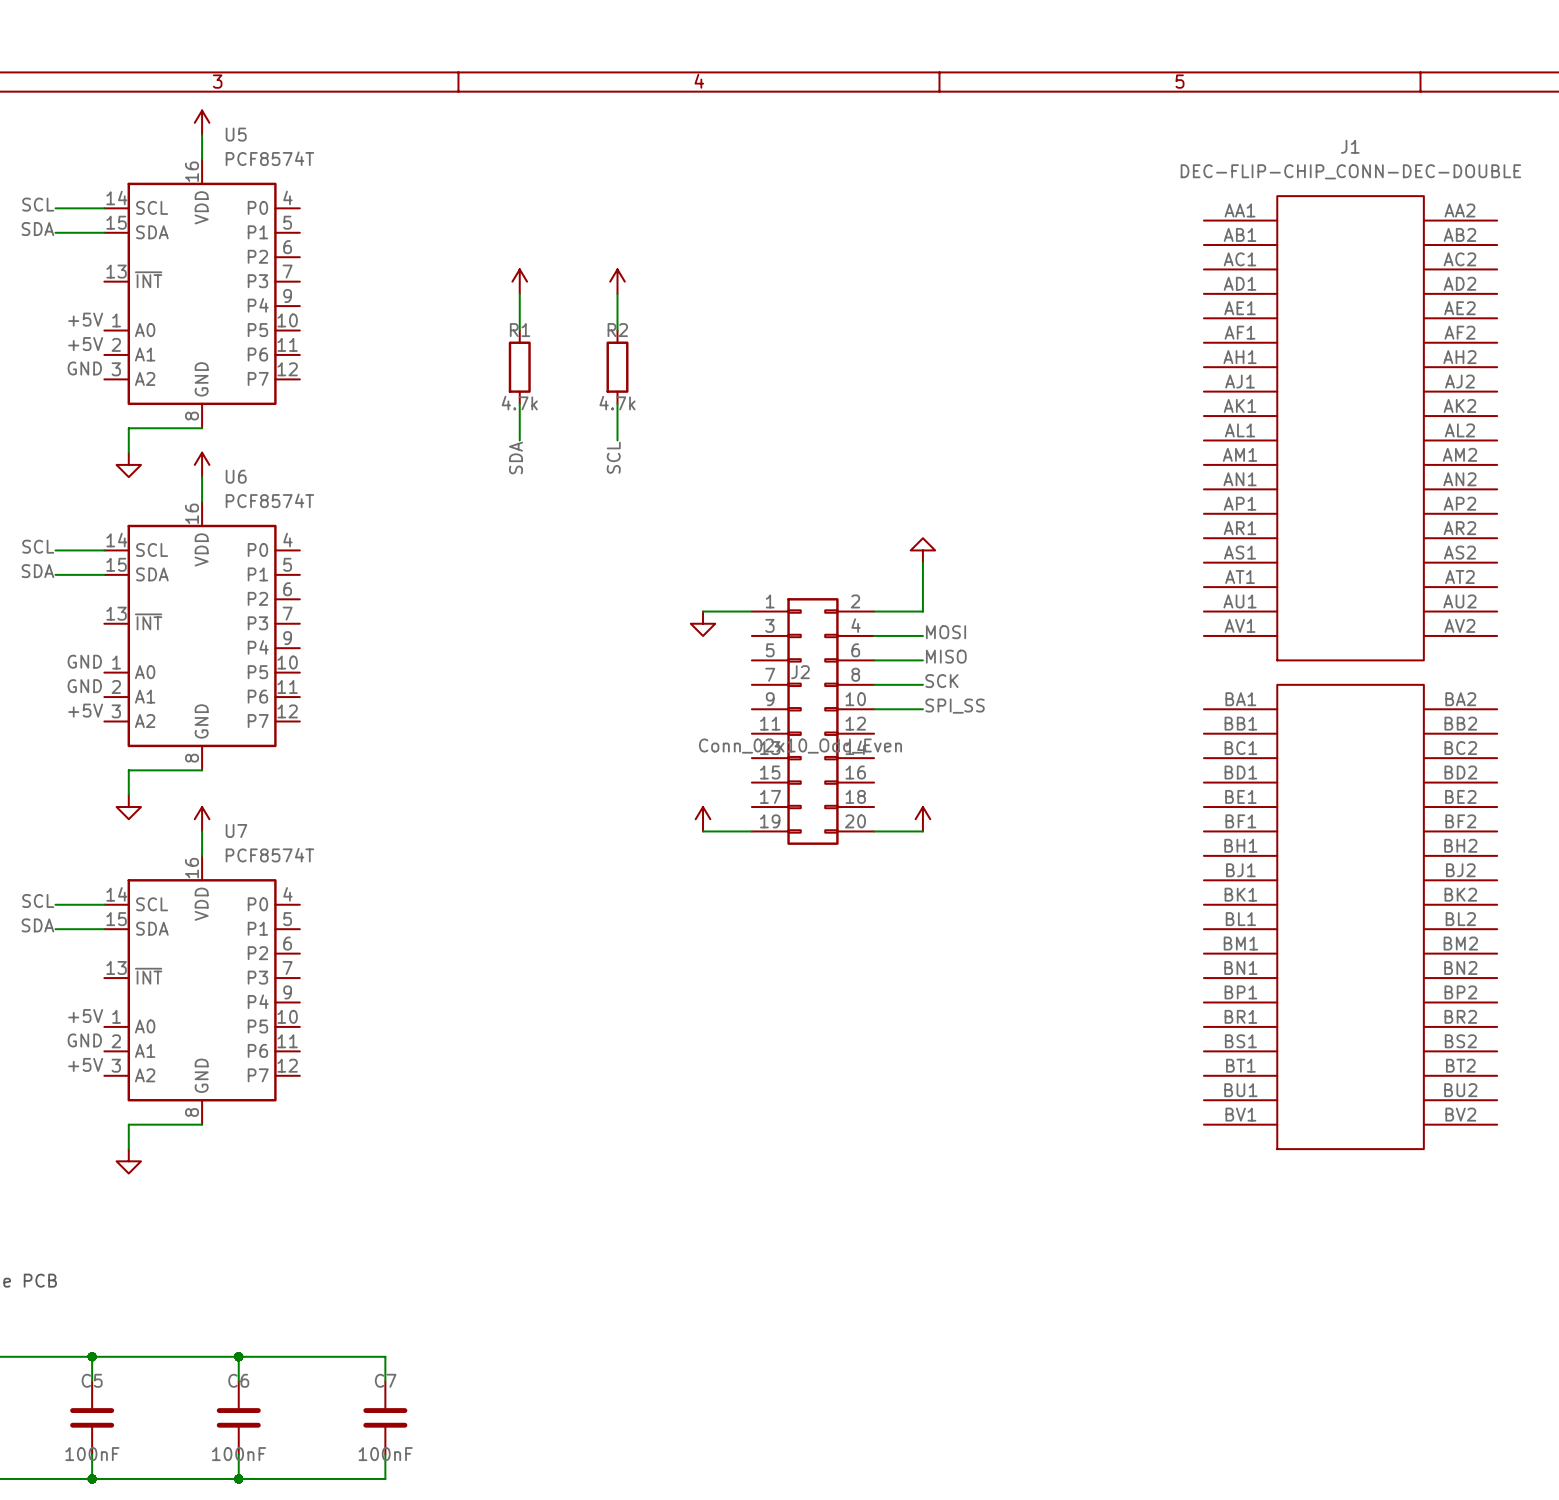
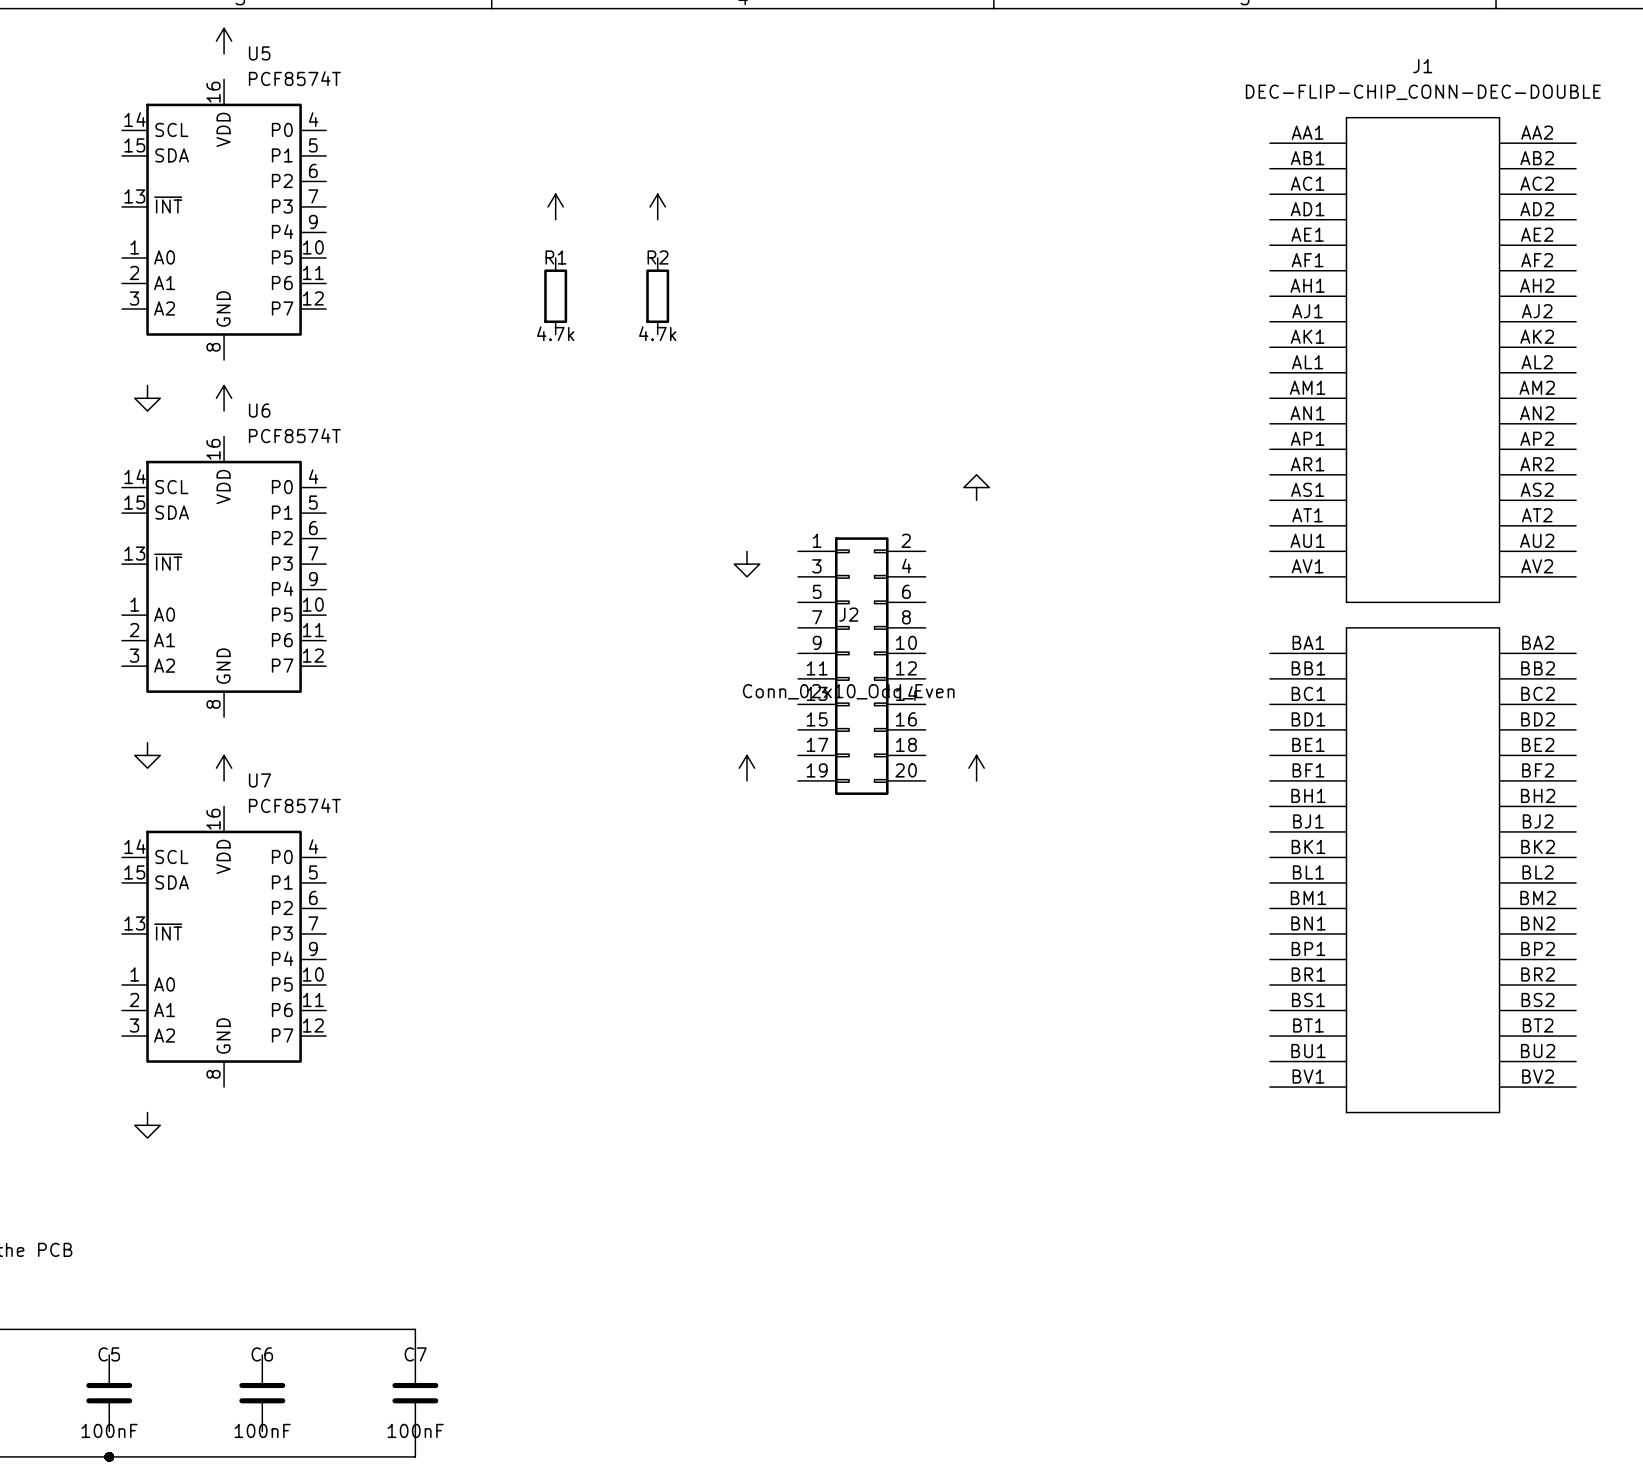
wire: (202, 135) (202, 159) -> none
label: SCL (38, 204) -> none
wire: (55, 208) (104, 208) -> none
label: SDA (37, 229) -> none
wire: (55, 232) (104, 232) -> none
wire: (519, 293) (519, 330) -> none
wire: (617, 293) (617, 330) -> none
label: +5V (85, 319) -> none
label: +5V (85, 344) -> none
label: GND (84, 368) -> none
wire: (519, 403) (519, 440) -> none
wire: (617, 403) (617, 440) -> none
wire: (202, 428) (128, 428) (128, 452) -> none
label: SCL (613, 457) -> none
label: SDA (516, 458) -> none
wire: (202, 477) (202, 501) -> none
label: SCL (38, 546) -> none
wire: (55, 550) (104, 550) -> none
wire: (922, 562) (922, 611) (874, 611) -> none
label: SDA (37, 571) -> none
wire: (55, 574) (104, 574) -> none
wire: (703, 611) (751, 611) -> none
label: MOSI (946, 632) -> none
wire: (874, 635) (922, 635) -> none
label: MISO (946, 656) -> none
wire: (874, 660) (922, 660) -> none
label: GND (84, 661) -> none
label: SCK (941, 681) -> none
wire: (874, 684) (922, 684) -> none
label: GND (84, 686) -> none
label: SPI_SS (955, 706) -> none
wire: (874, 709) (922, 709) -> none
label: +5V (85, 710) -> none
wire: (202, 770) (128, 770) (128, 794) -> none
wire: (202, 831) (202, 855) -> none
wire: (703, 831) (751, 831) -> none
wire: (874, 831) (922, 831) -> none
label: SCL (38, 901) -> none
wire: (55, 904) (104, 904) -> none
label: SDA (37, 925) -> none
wire: (55, 929) (104, 929) -> none
label: +5V (85, 1016) -> none
label: GND (84, 1040) -> none
label: +5V (85, 1064) -> none
wire: (202, 1124) (128, 1124) (128, 1149) -> none
wire: (92, 1356) (92, 1381) -> none
junction: (92, 1356) -> none
wire: (238, 1356) (238, 1381) -> none
junction: (238, 1356) -> none
wire: (92, 1454) (92, 1478) -> none
wire: (238, 1454) (238, 1478) -> none
junction: (238, 1478) -> none

